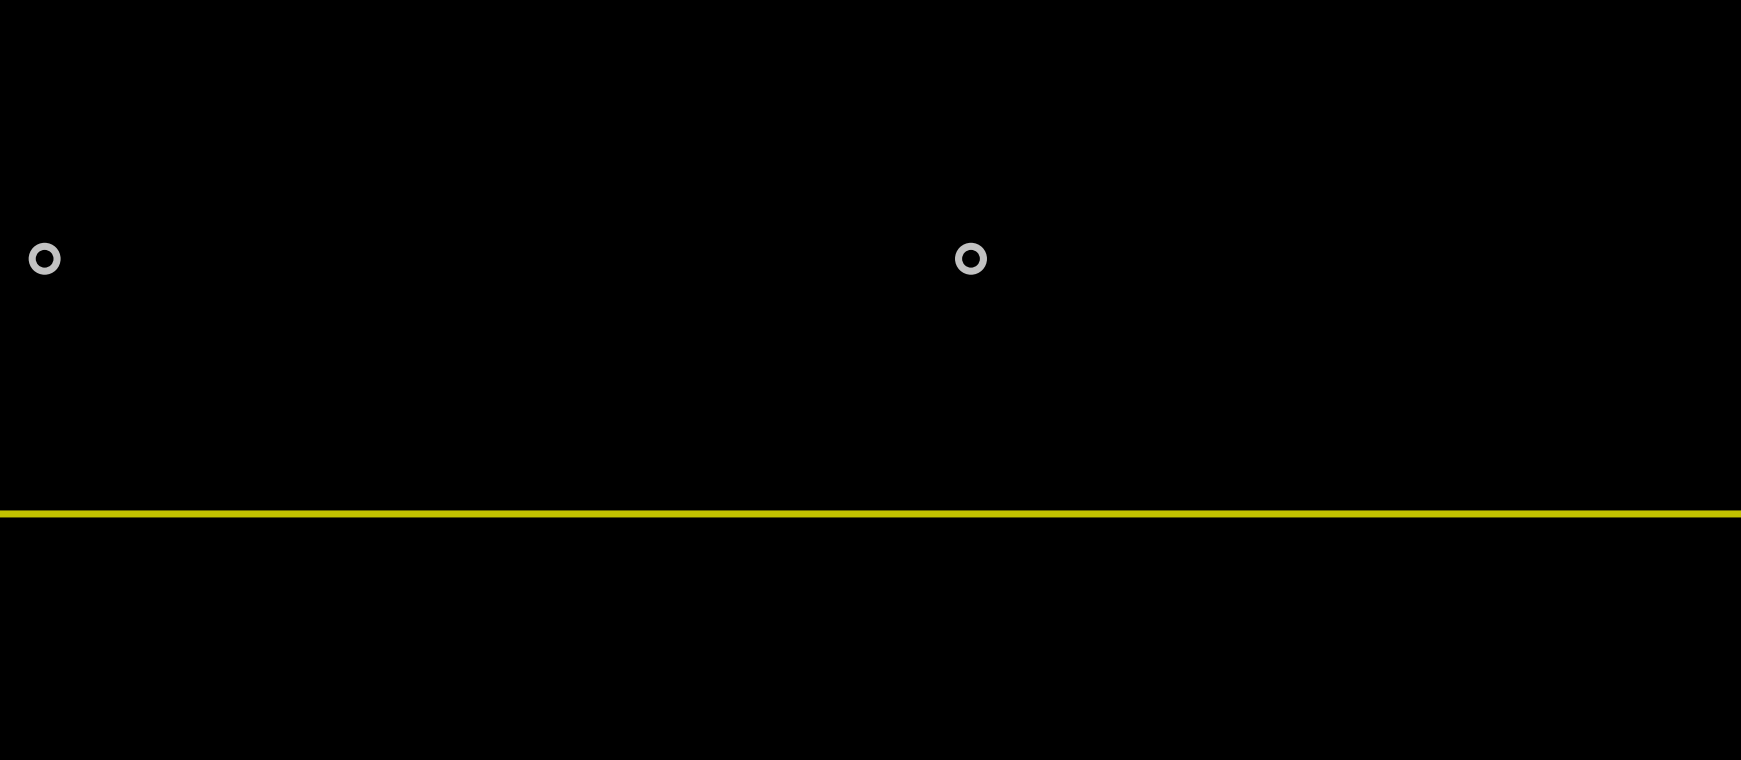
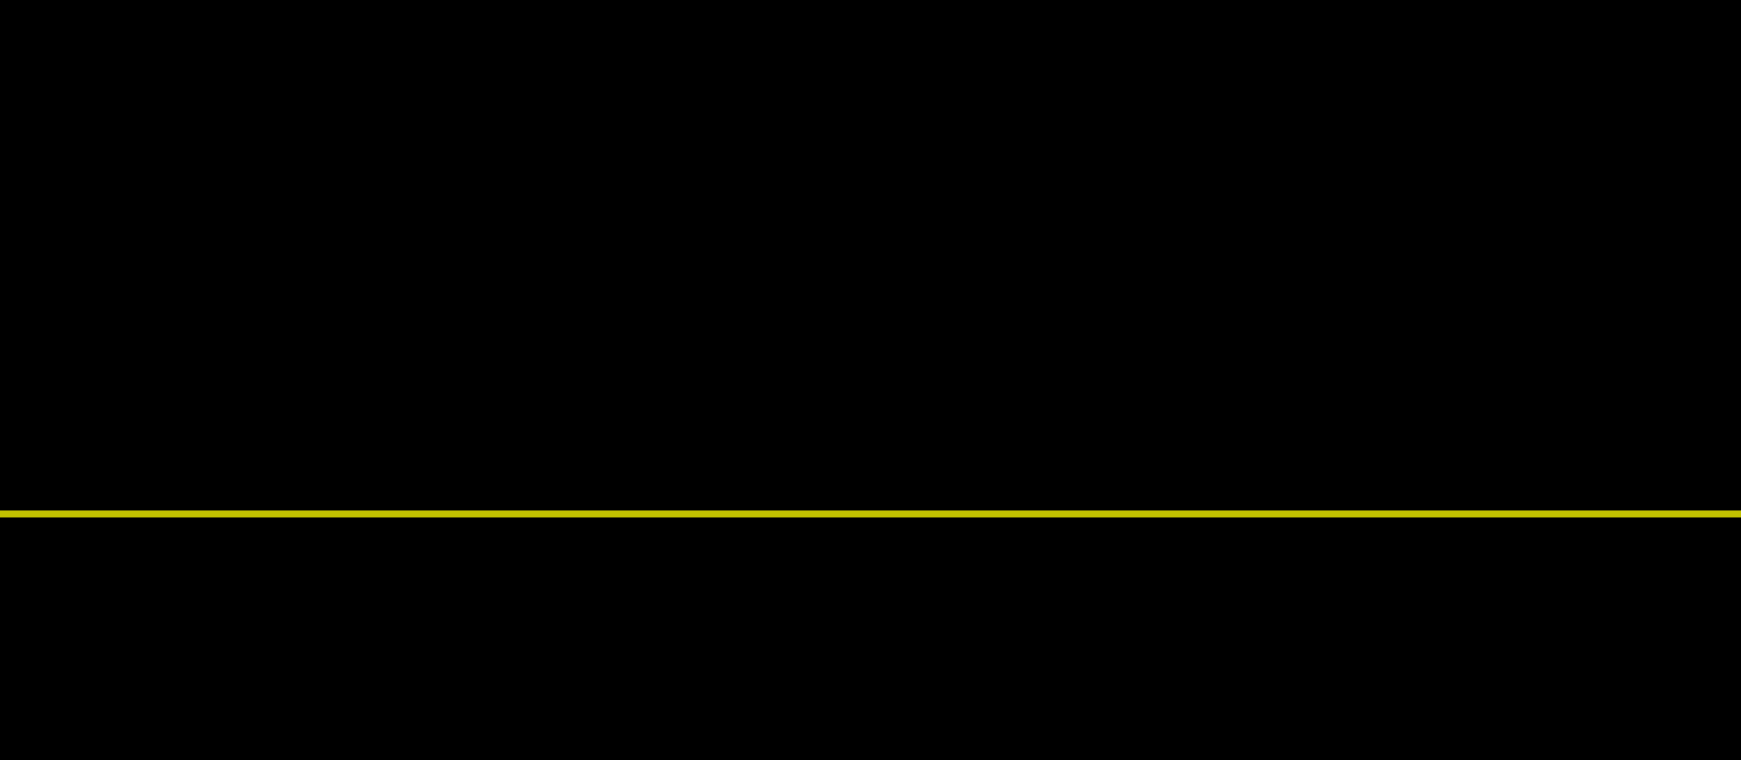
via: (44, 258) -> none
via: (970, 258) -> none

